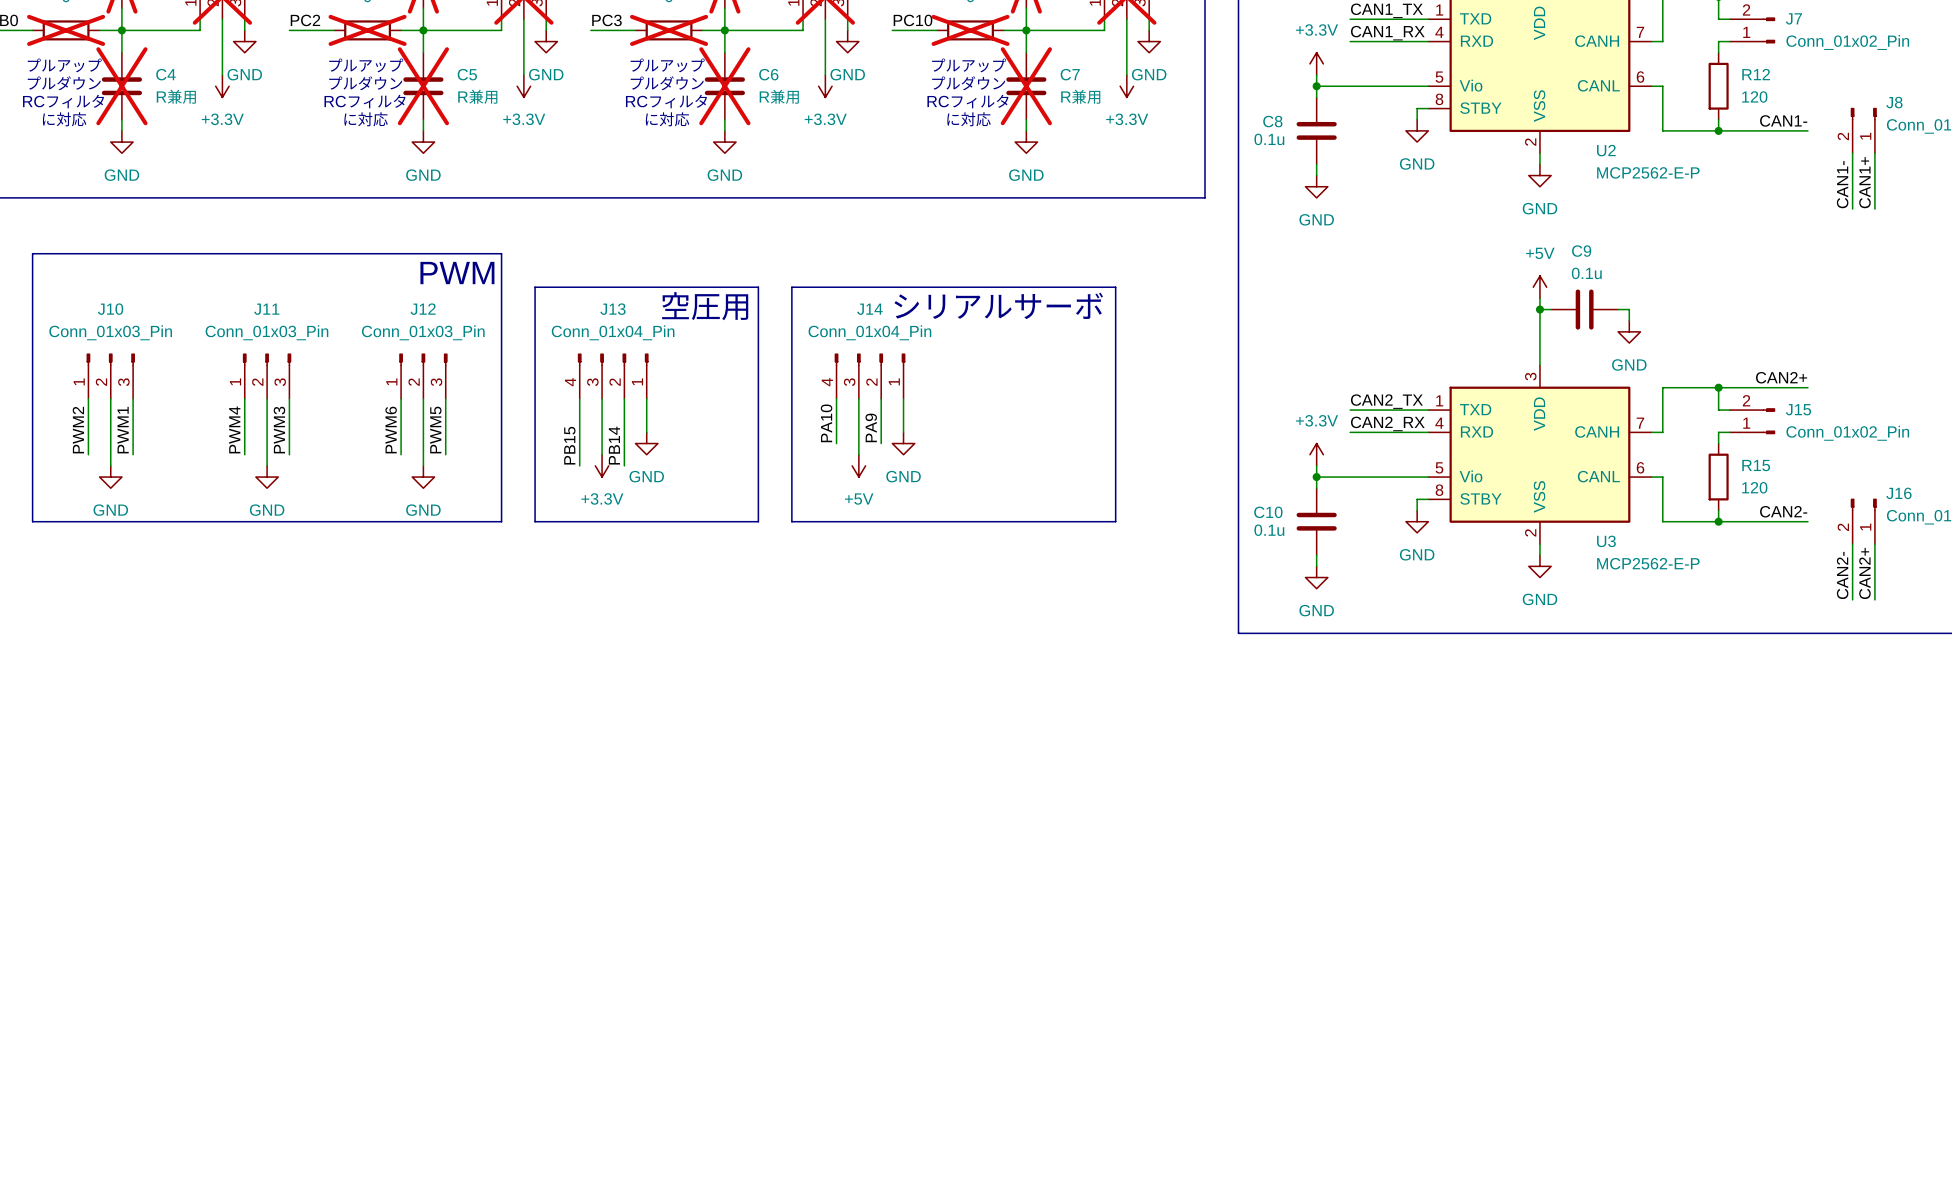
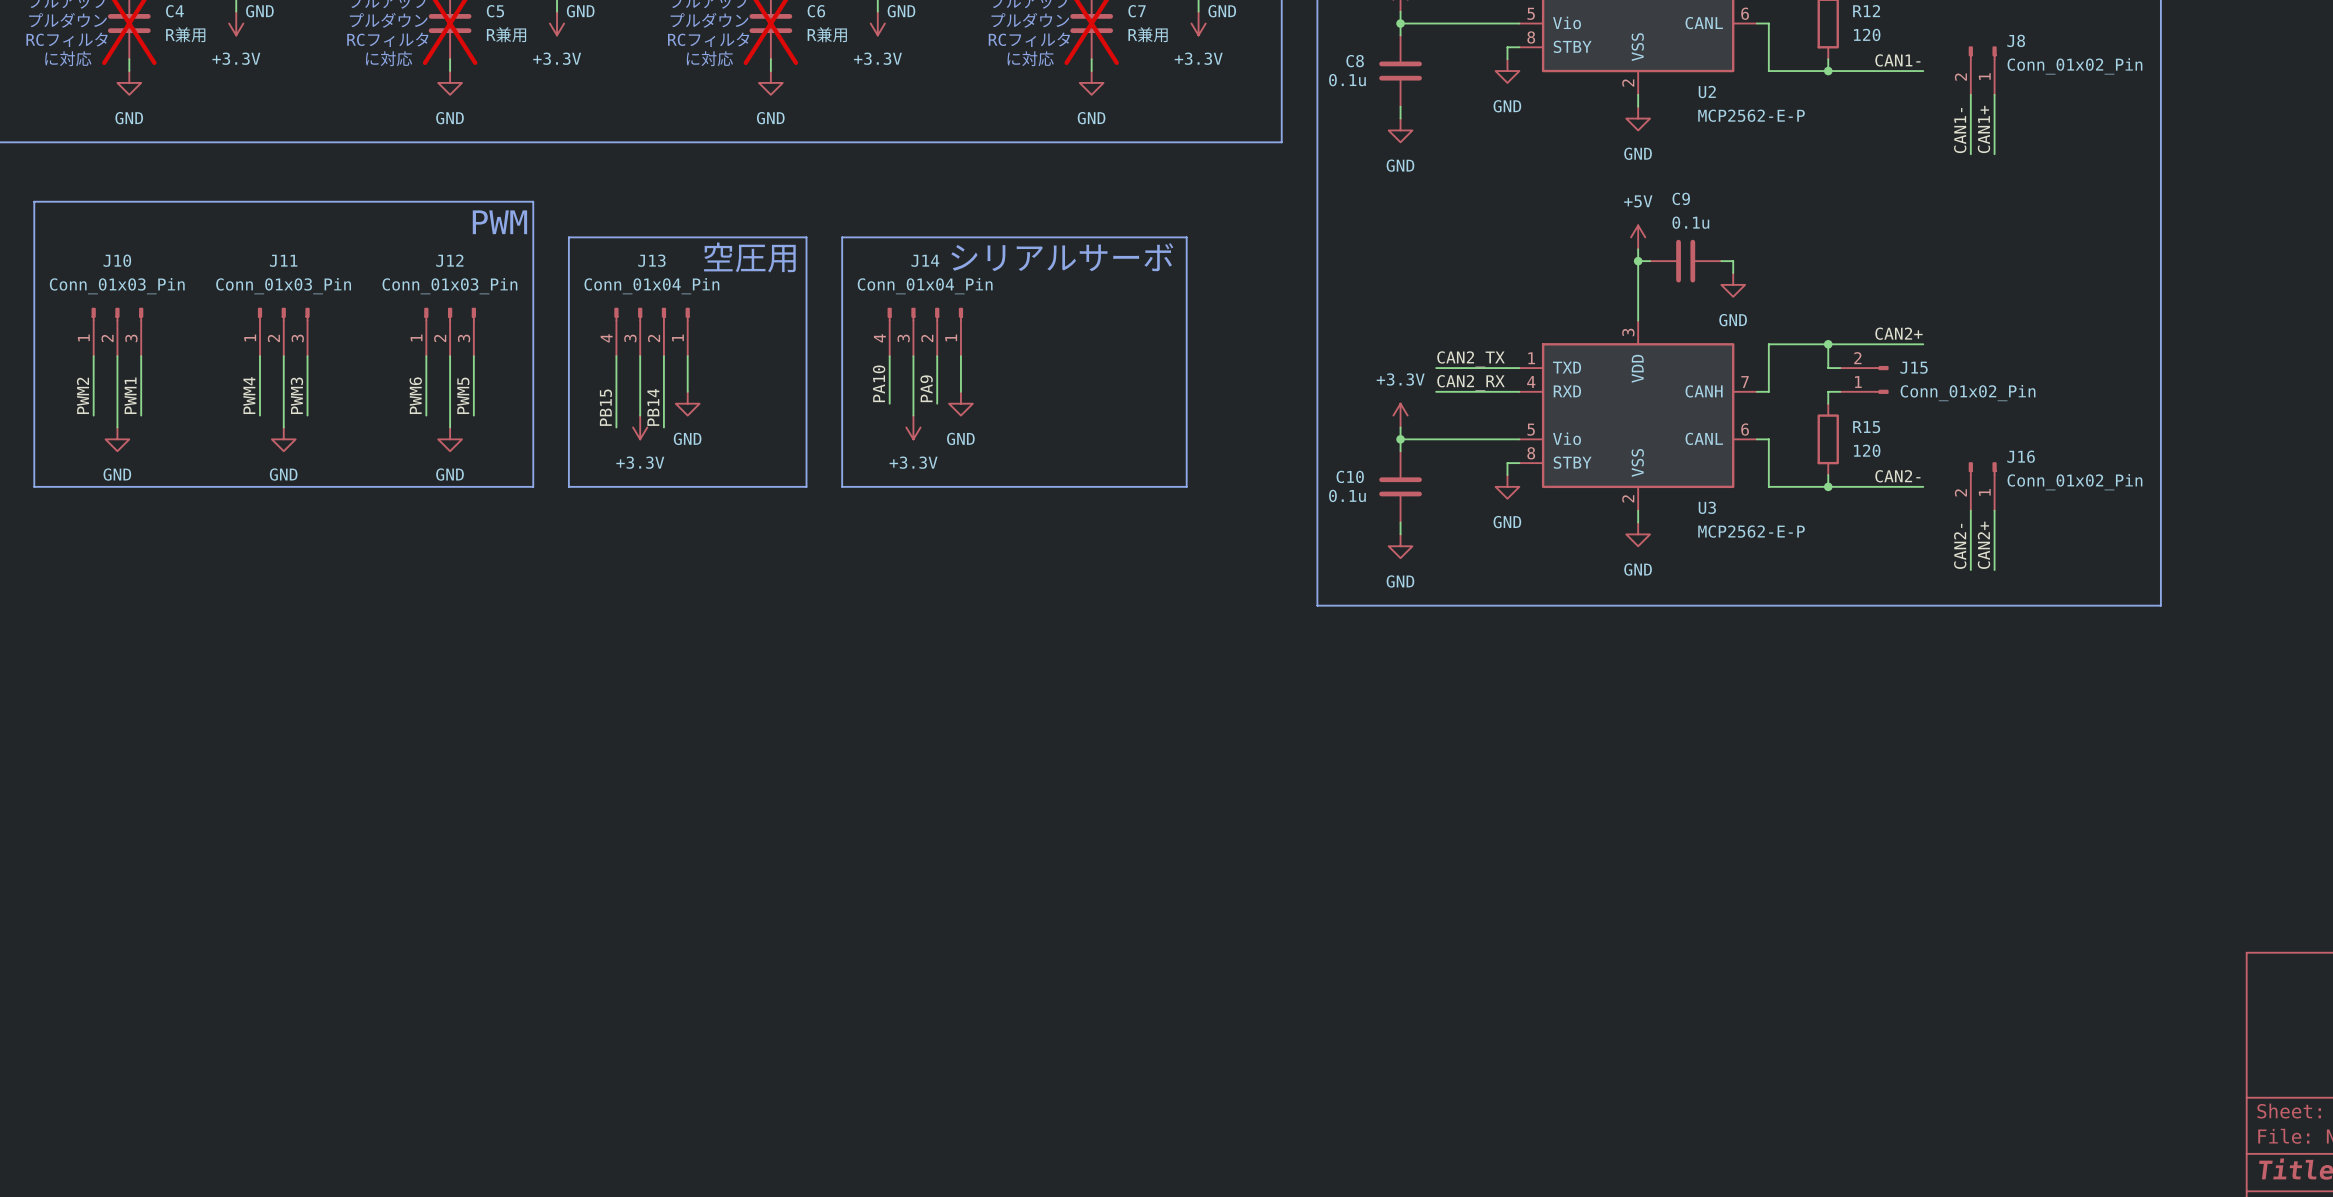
power symbol: +5V (858, 465) -> +3.3V (913, 427)

